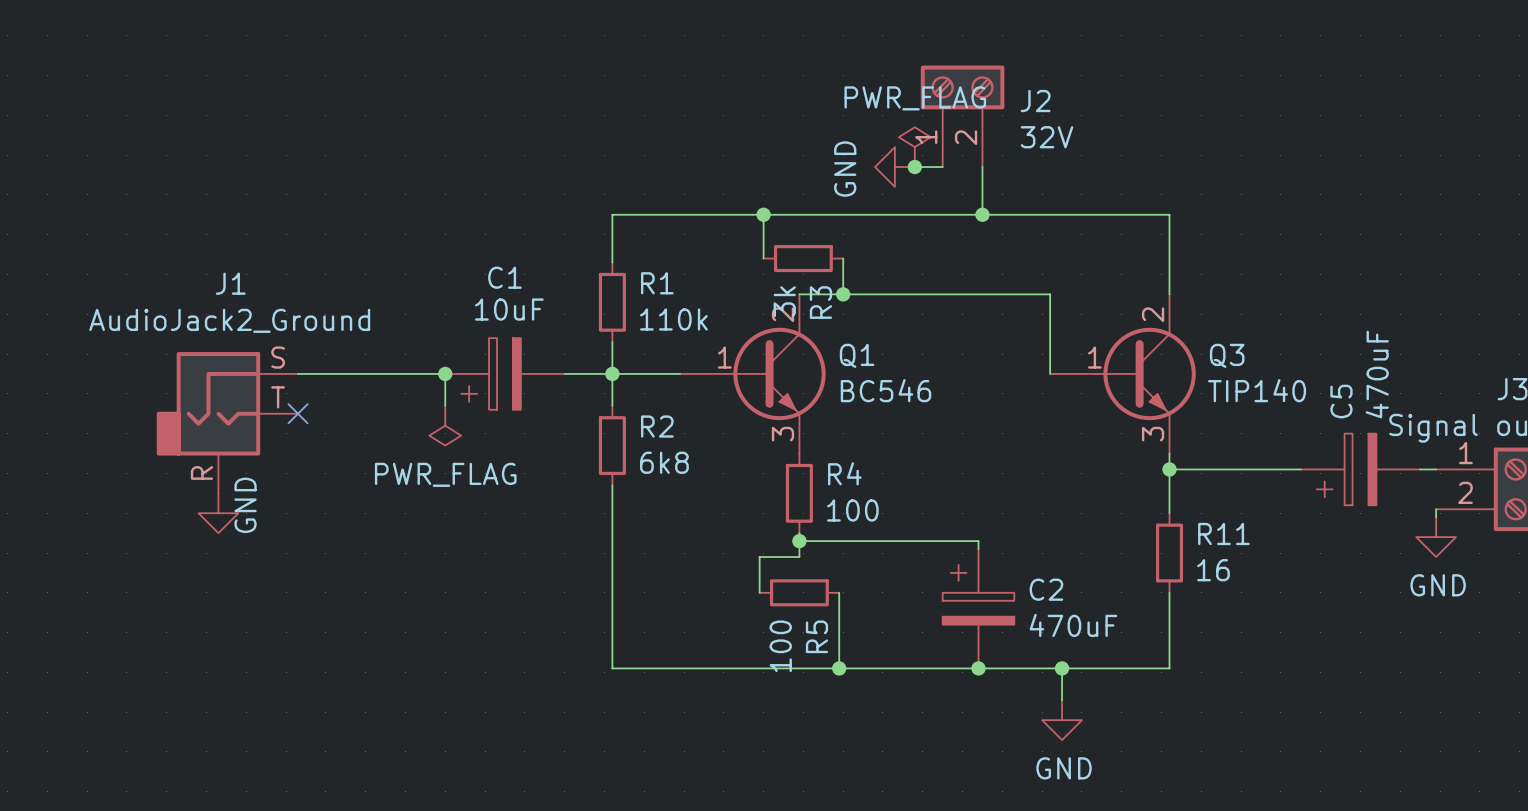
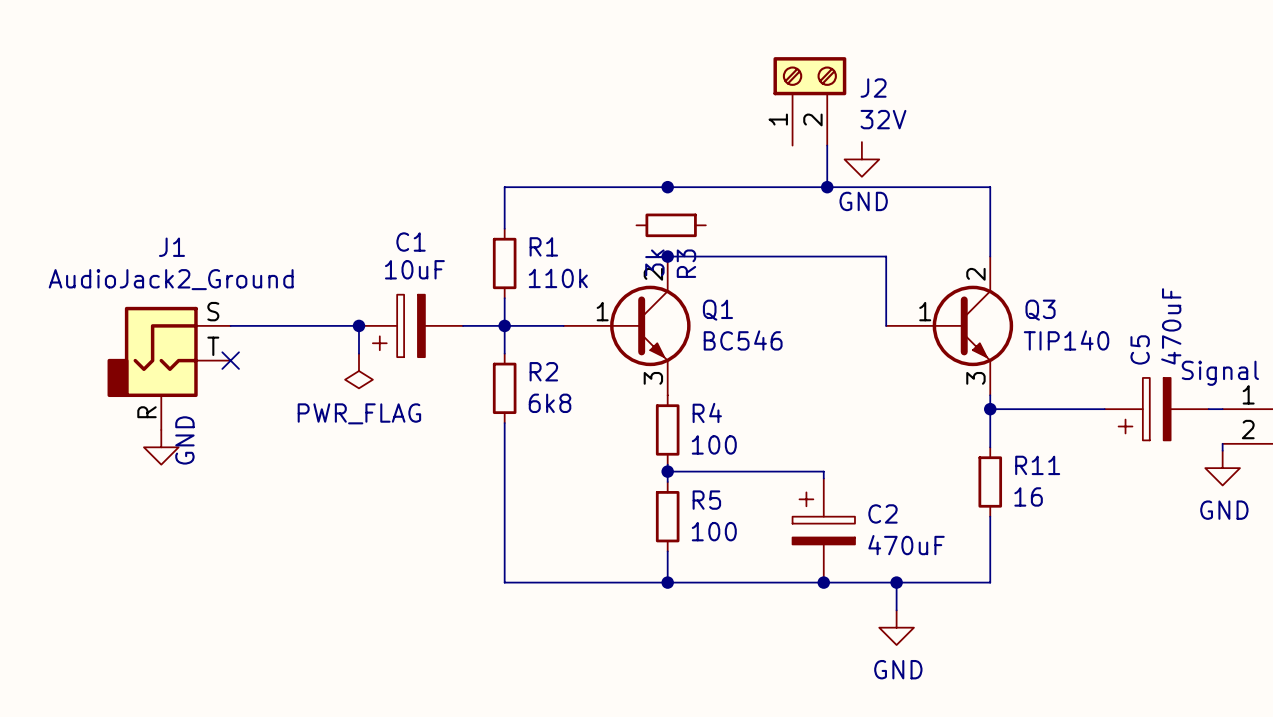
power symbol: PWR_FLAG (914, 147) -> none
power symbol rotation: 0° (894, 167) -> 90° counterclockwise (861, 159)
power symbol position: GND (894, 167) -> GND (861, 159)
wire: (914, 167) (942, 167) -> none
junction: (914, 167) -> none
wire: (763, 214) (763, 258) -> none
junction position: (763, 214) -> (667, 187)
wire: (843, 258) (843, 294) -> (667, 551) (667, 582)
junction: none -> (667, 256)
junction: (843, 294) -> none
wire: (799, 553) (799, 557) (759, 557) (759, 592) -> none
R5 rotation: 0° (799, 592) -> 90° clockwise (667, 516)
wire: (839, 592) (839, 668) -> none
R5 name position: R5 (816, 636) -> R5 (706, 500)
R5 value position: 100 (780, 646) -> 100 (714, 531)
junction position: (839, 668) -> (667, 582)

